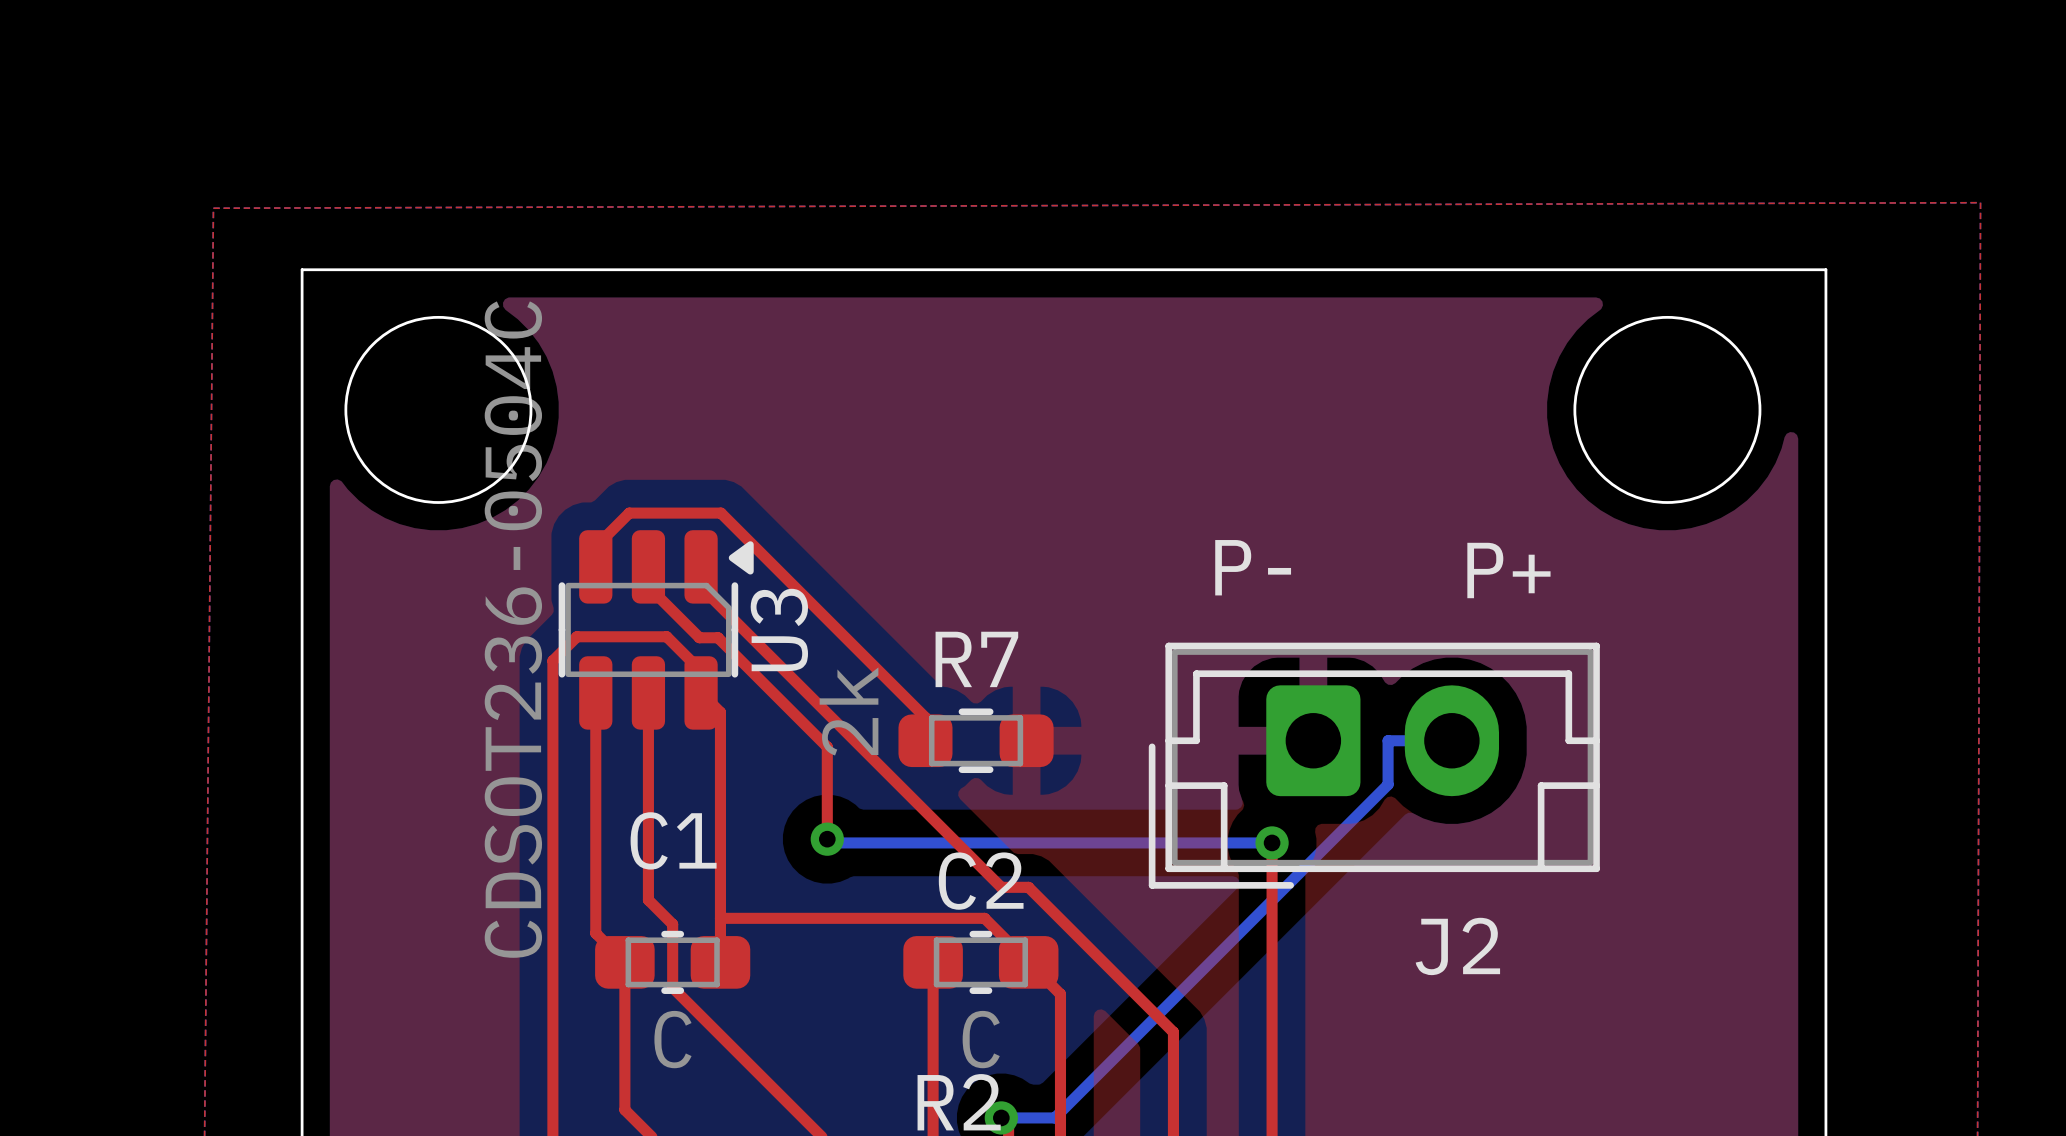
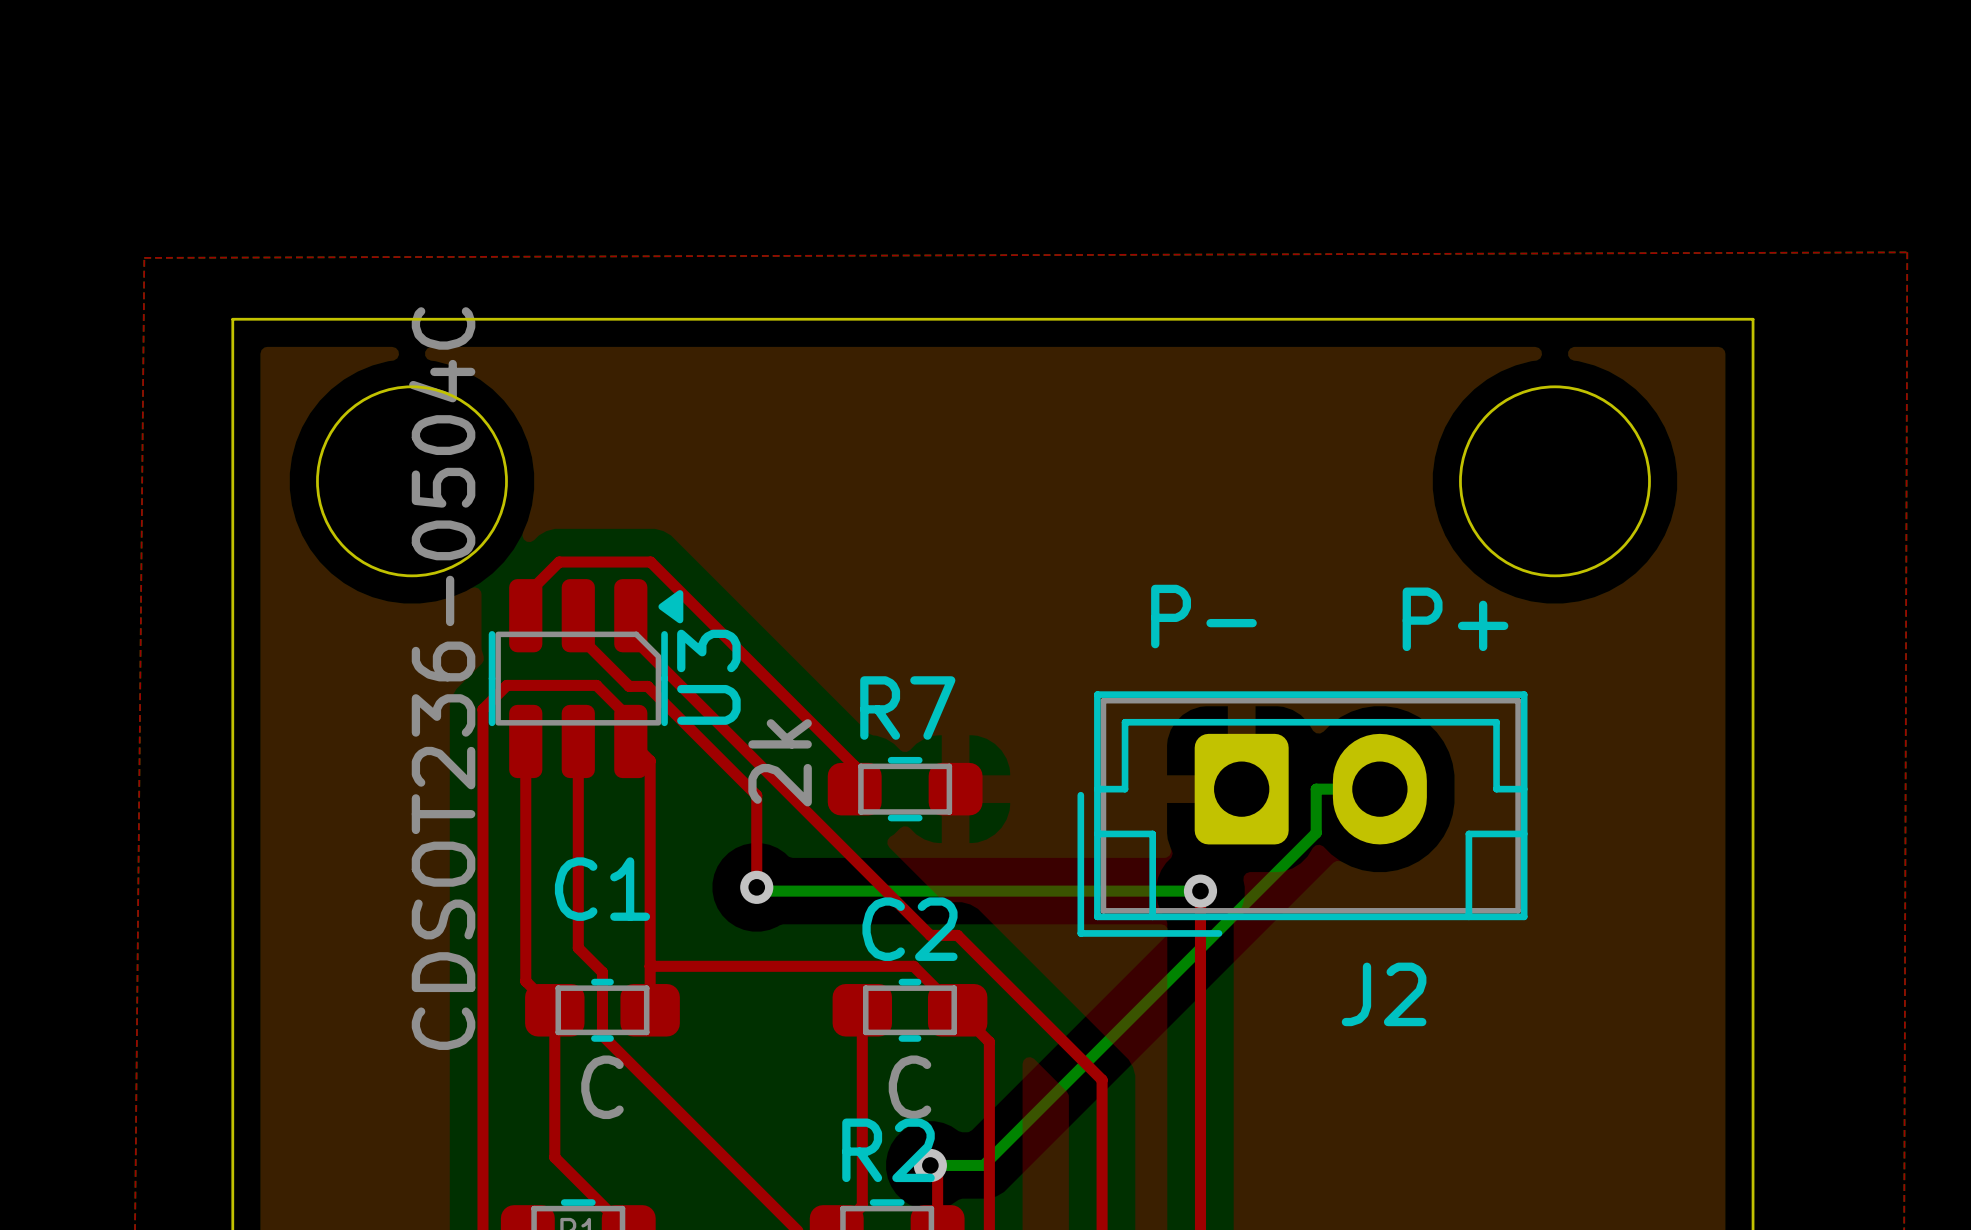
round board edge position: (438, 409) -> (411, 481)
round board edge position: (1667, 409) -> (1554, 481)

